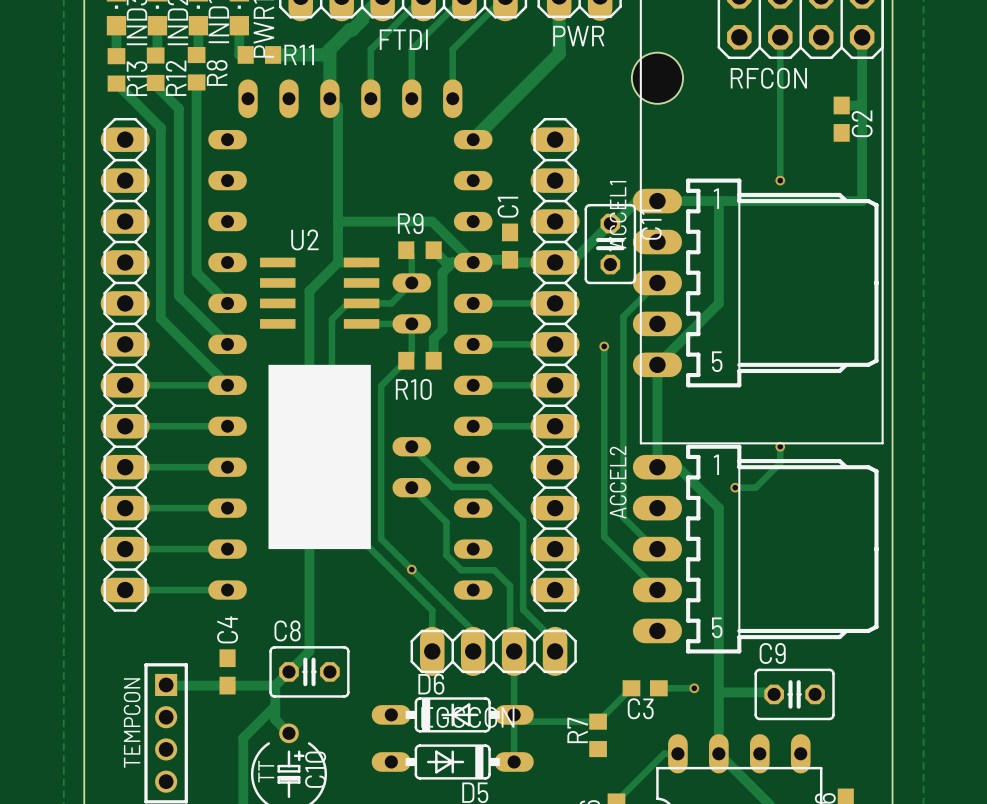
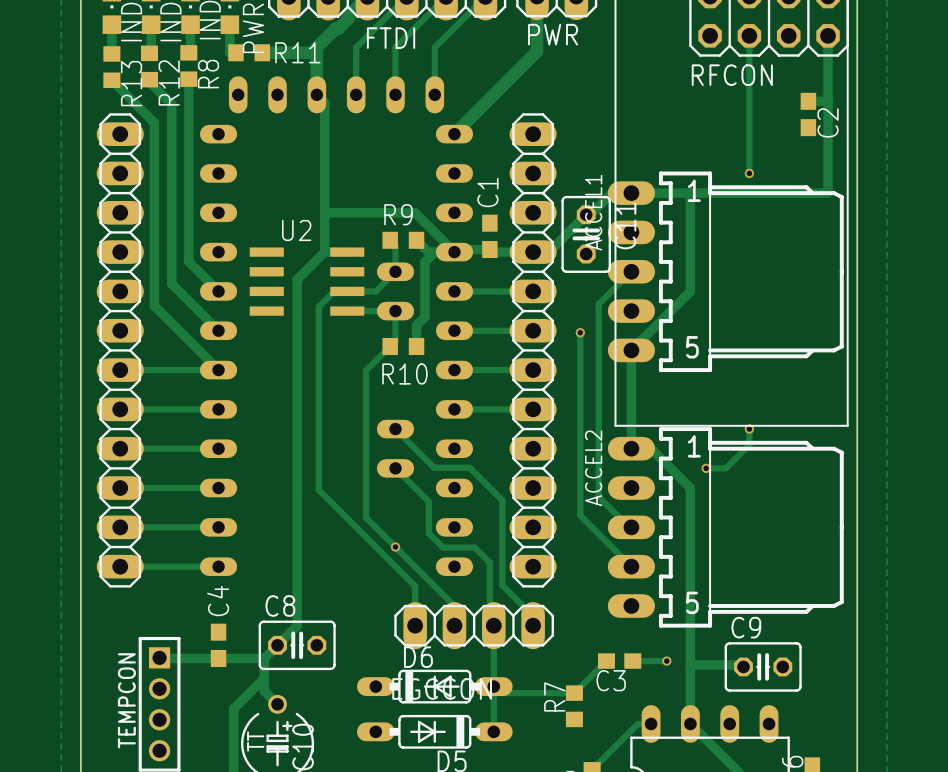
hole: (657, 78) -> none
drawing: [268, 364, 371, 550] -> none

